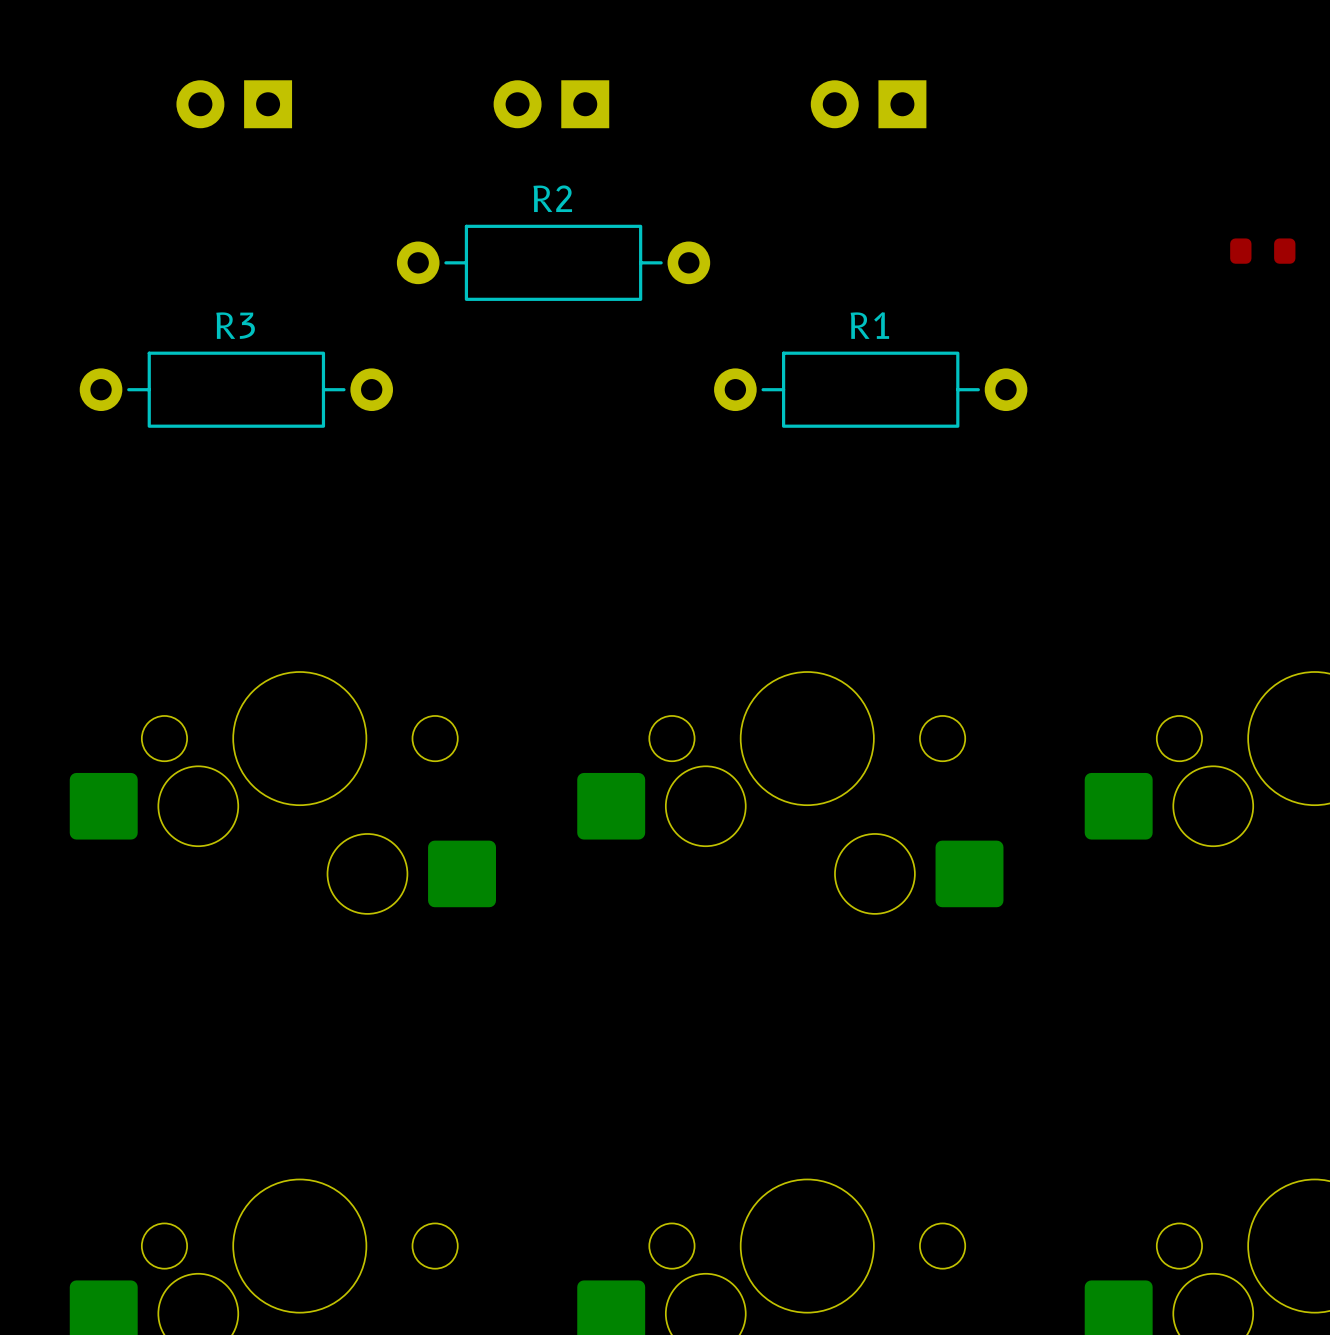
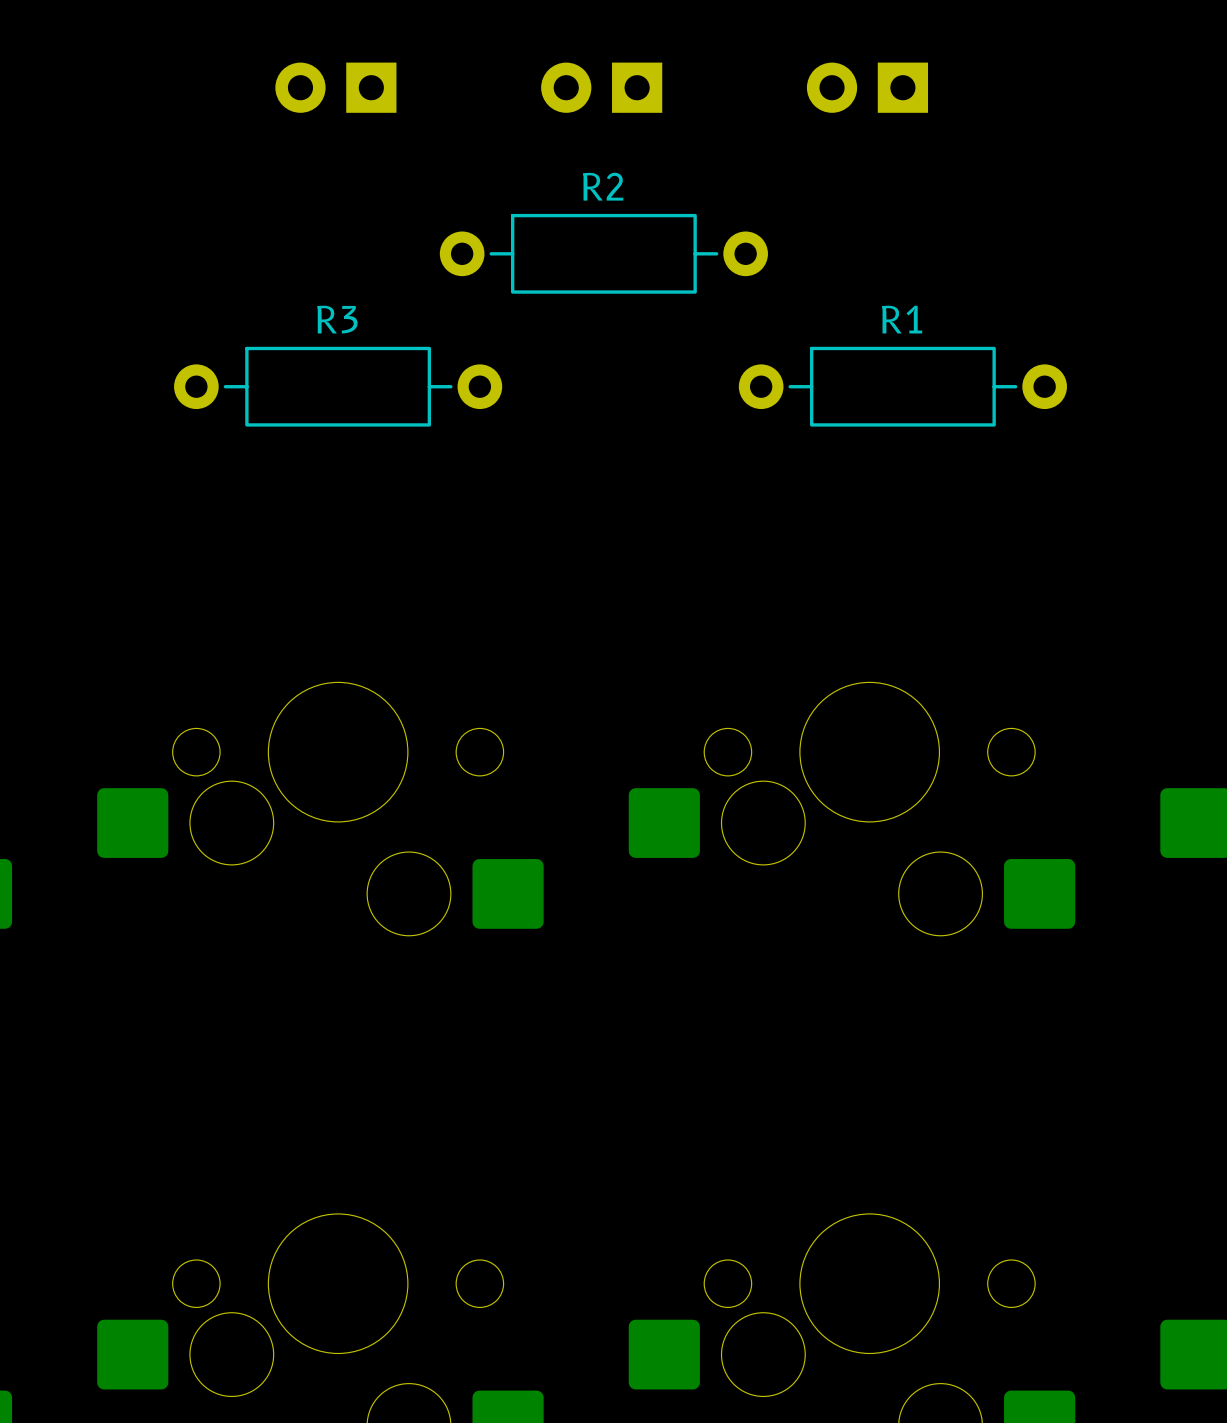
part position: (234, 104) -> (335, 87)
part position: (868, 104) -> (867, 87)
R3 position: (236, 389) -> (338, 386)
R1 position: (870, 389) -> (902, 386)

